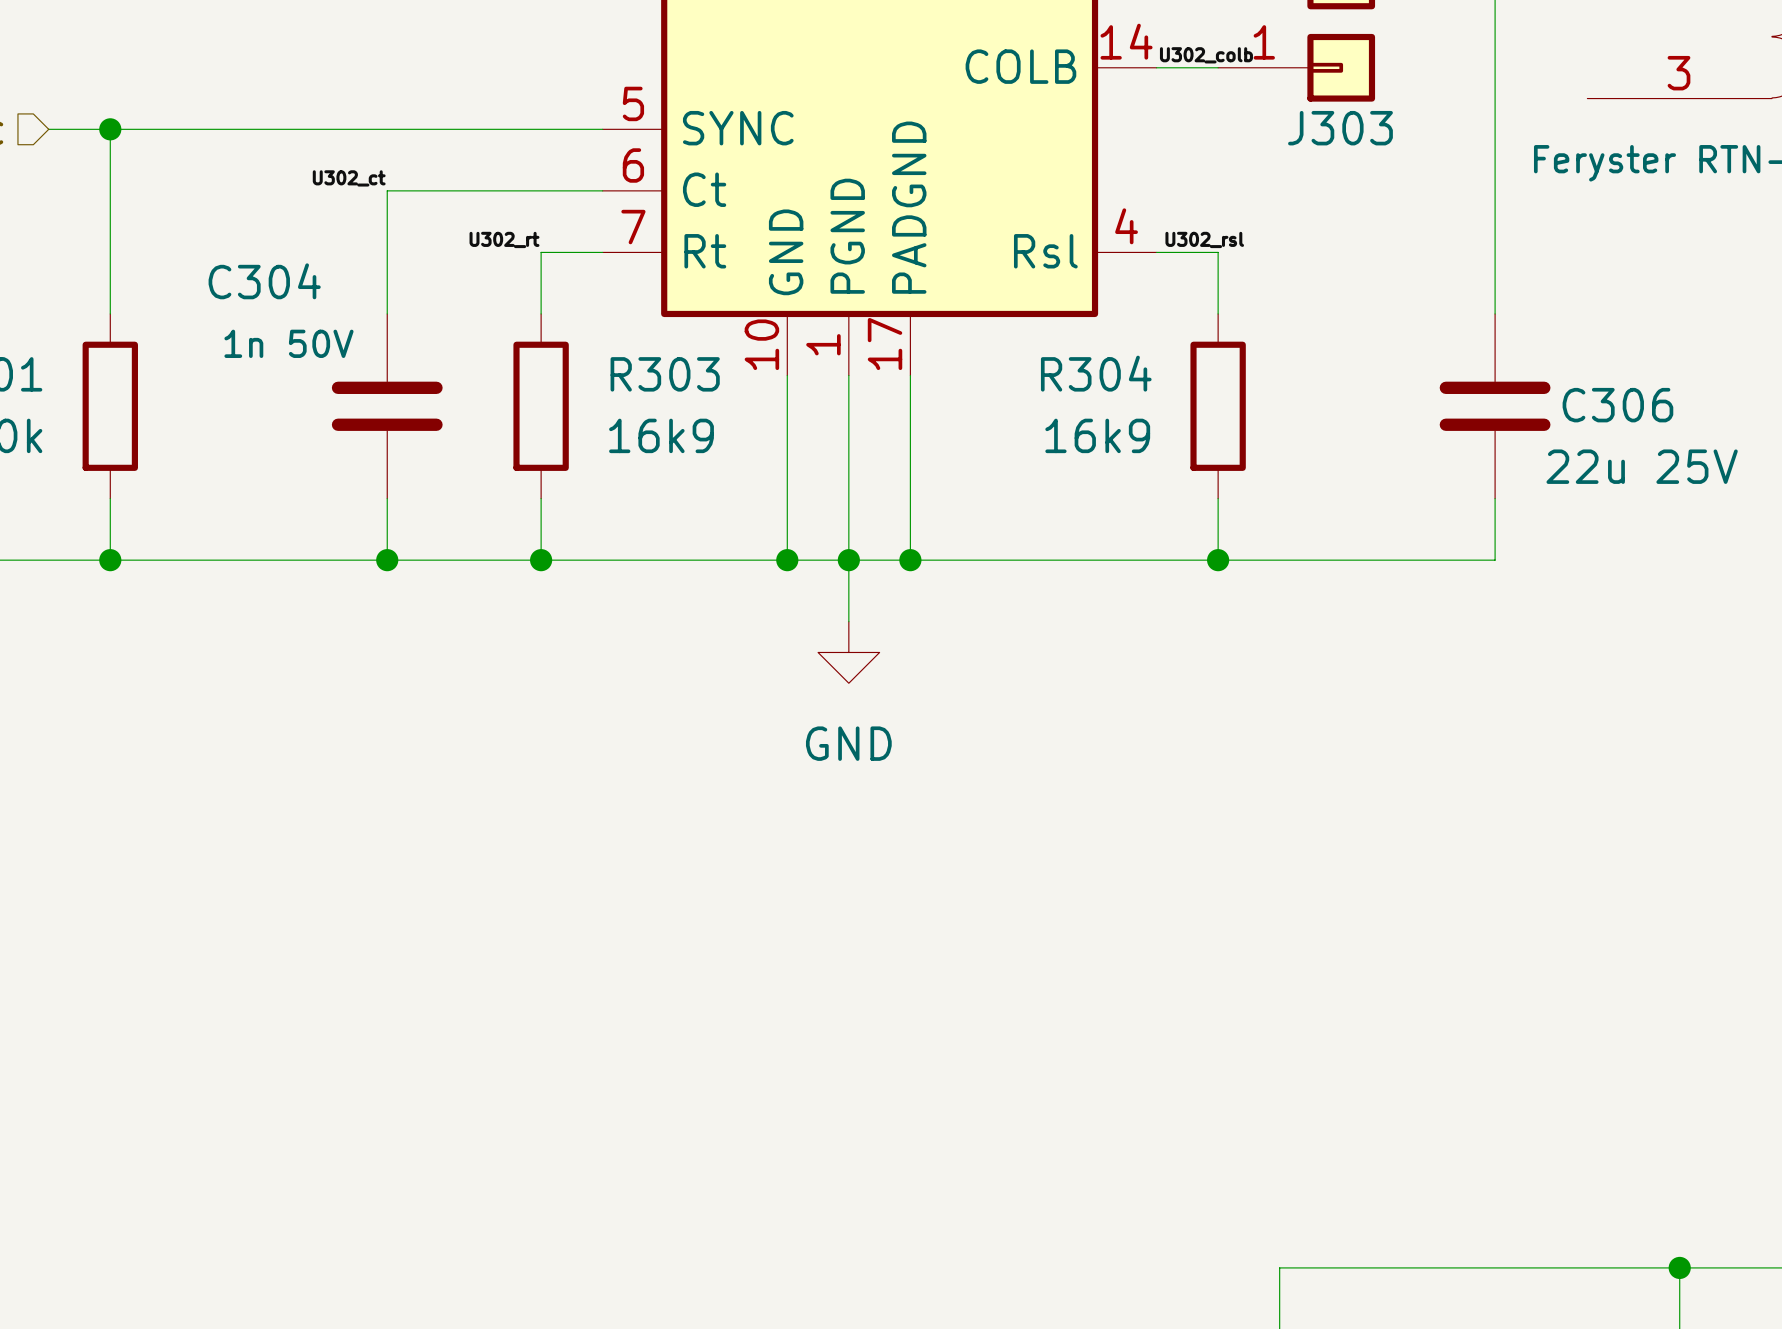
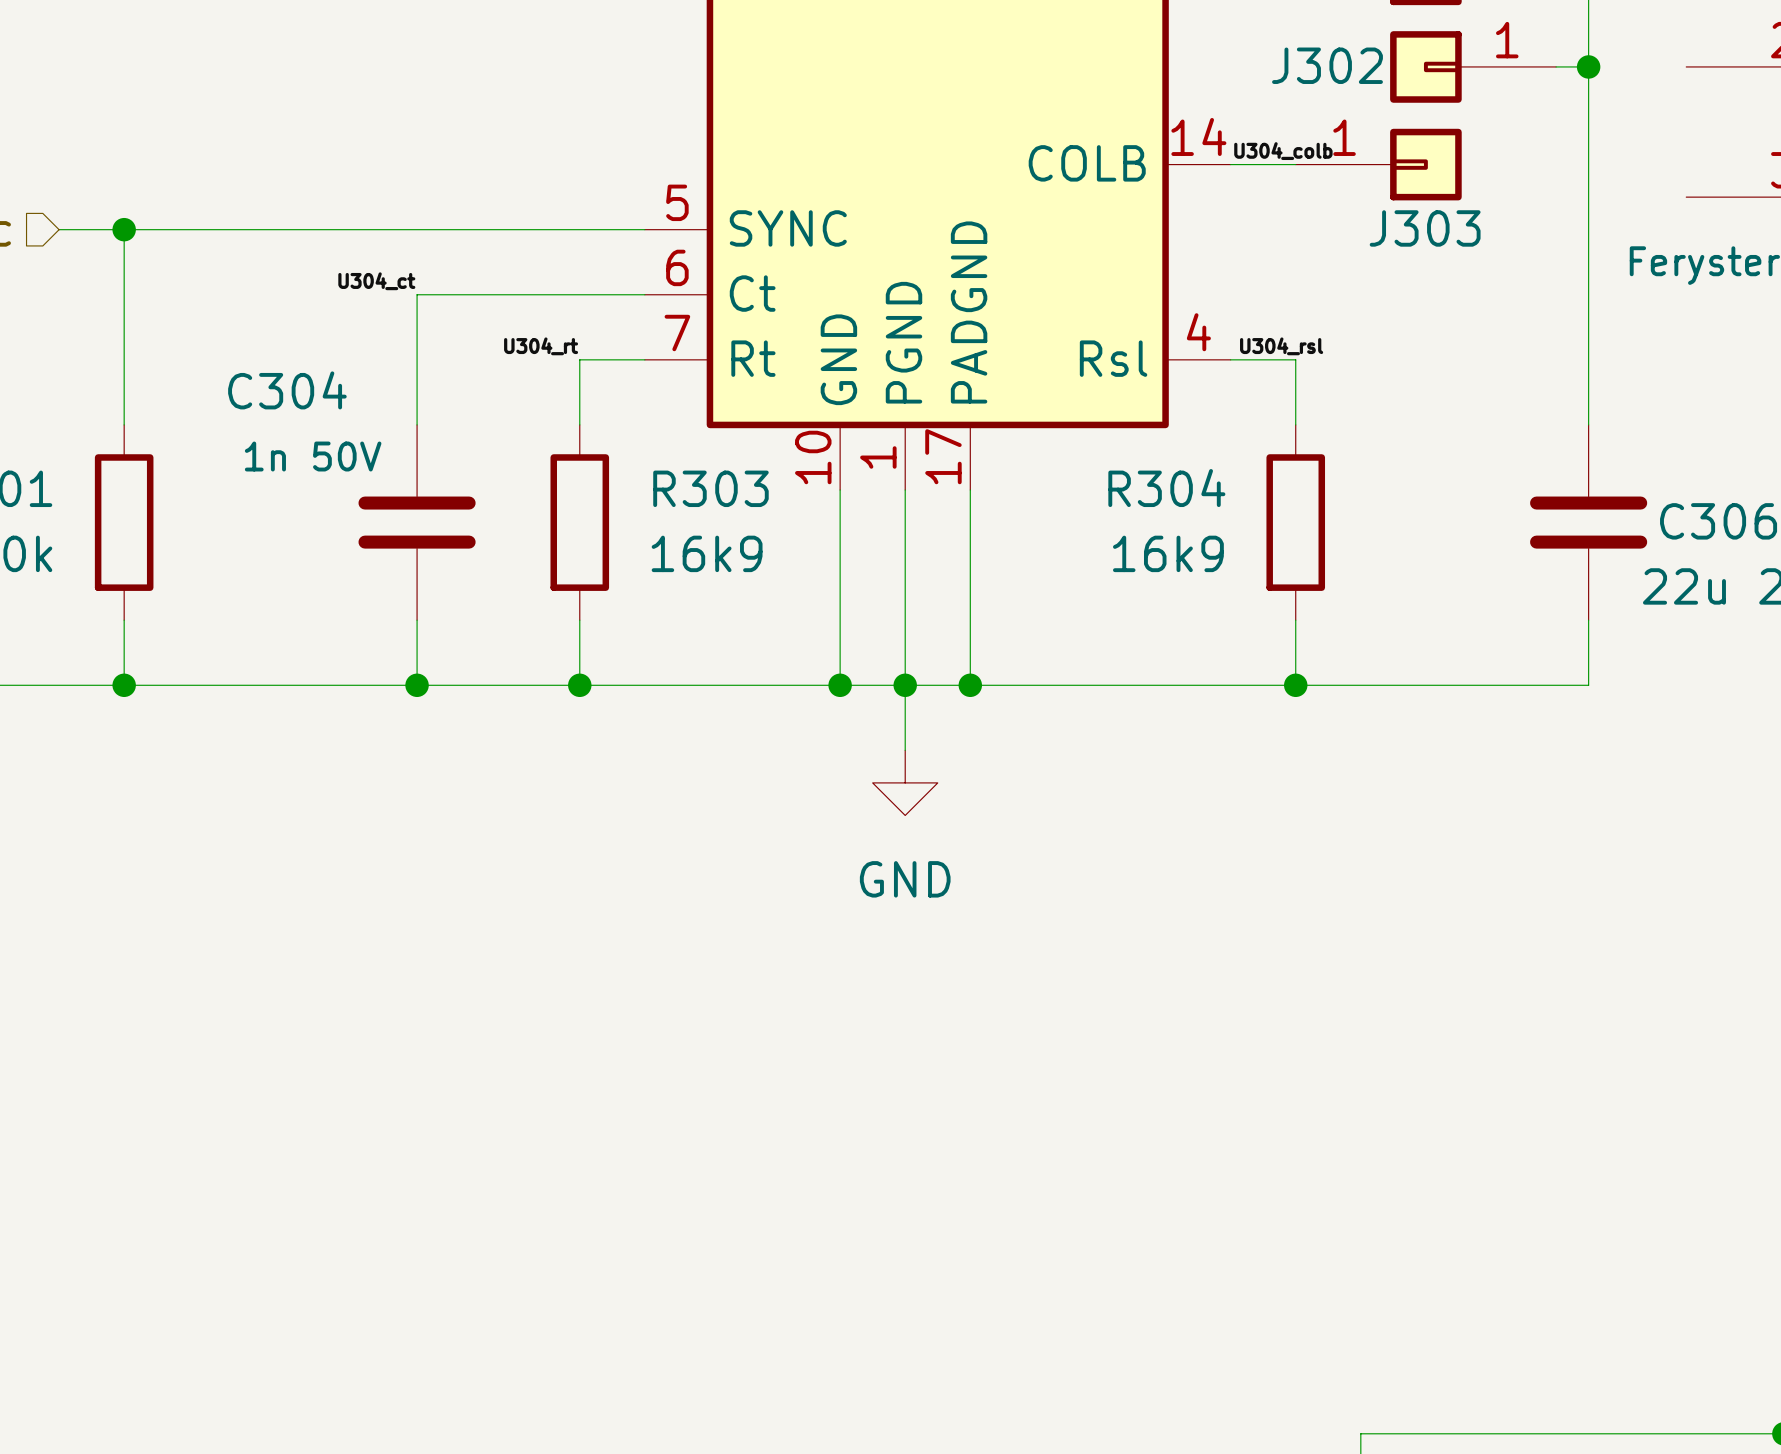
label: U302_colb (1206, 55) -> U304_colb (1283, 151)
label: U302_ct (349, 178) -> U304_ct (376, 281)
label: U302_rt (504, 239) -> U304_rt (541, 346)
label: U302_rsl (1204, 239) -> U304_rsl (1281, 346)

